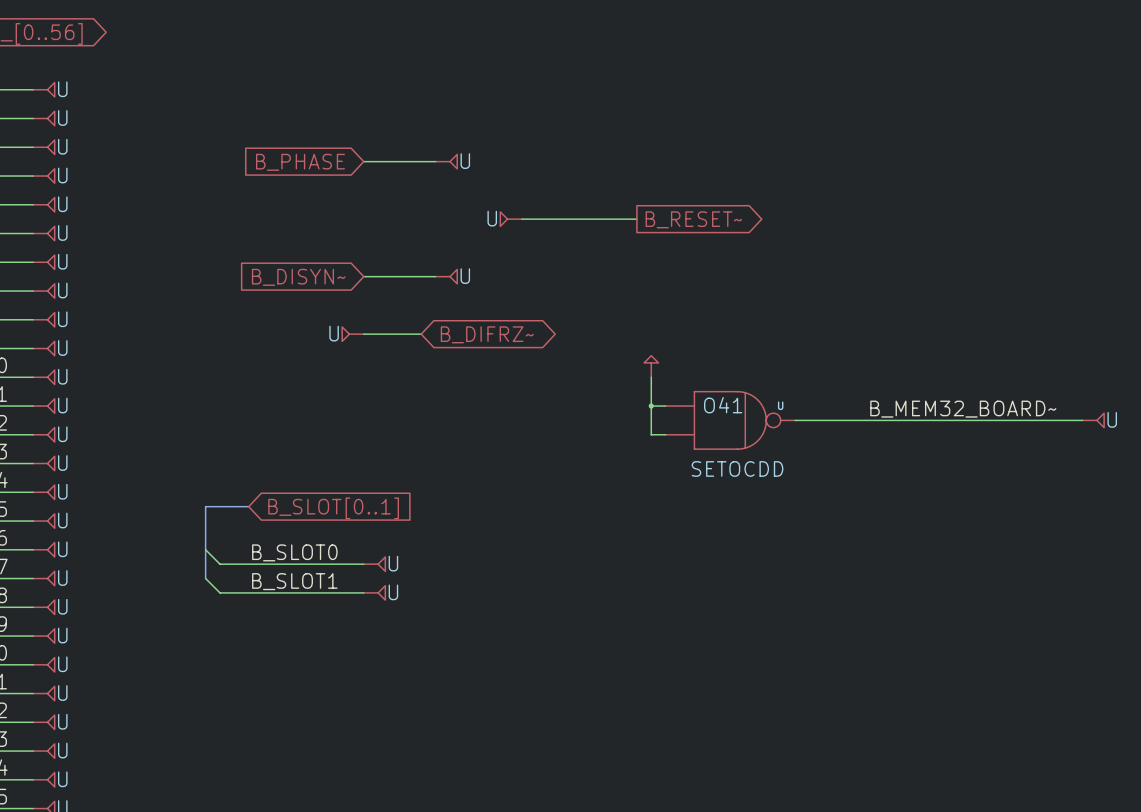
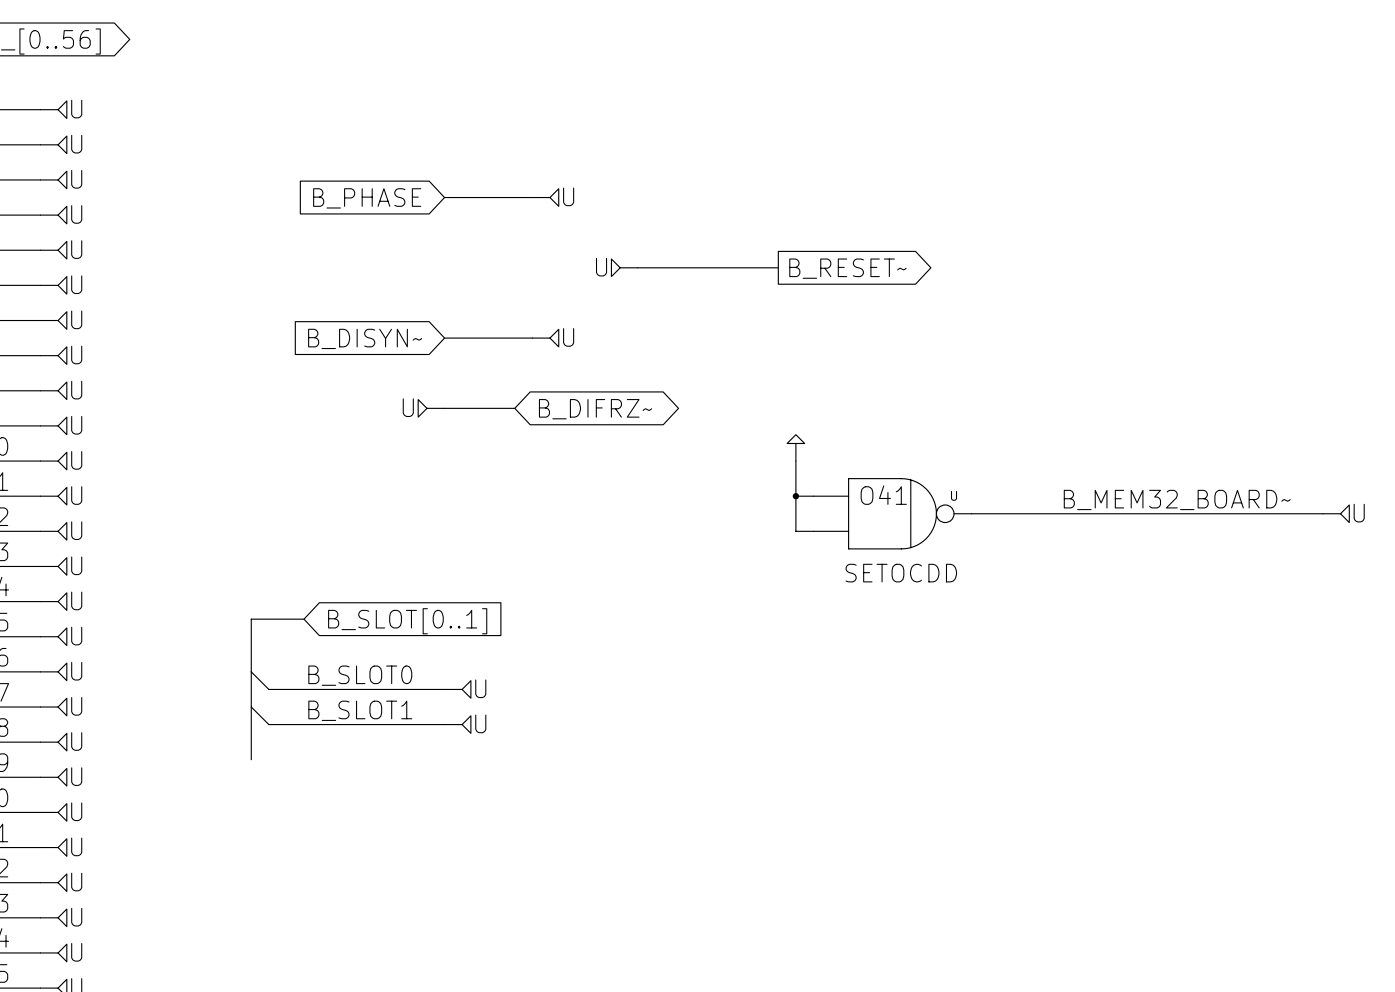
bus: none -> (251, 707) (251, 759)

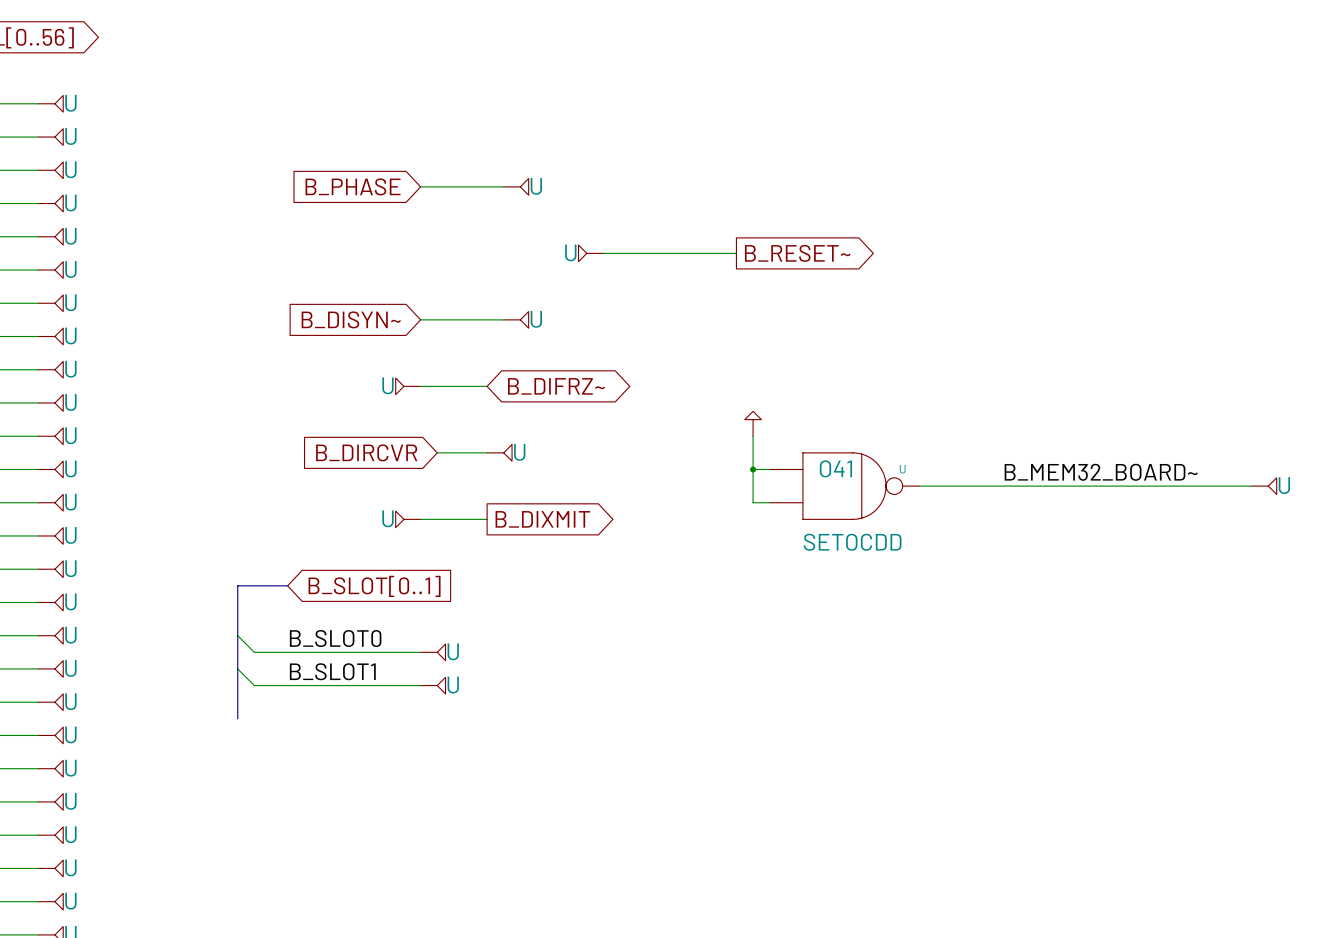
wire: none -> (437, 452) (487, 452)
U: none -> (499, 452)
global label: none -> B_DIRCVR (366, 452)
U: none -> (407, 519)
wire: none -> (420, 519) (487, 519)
global label: none -> B_DIXMIT (542, 519)

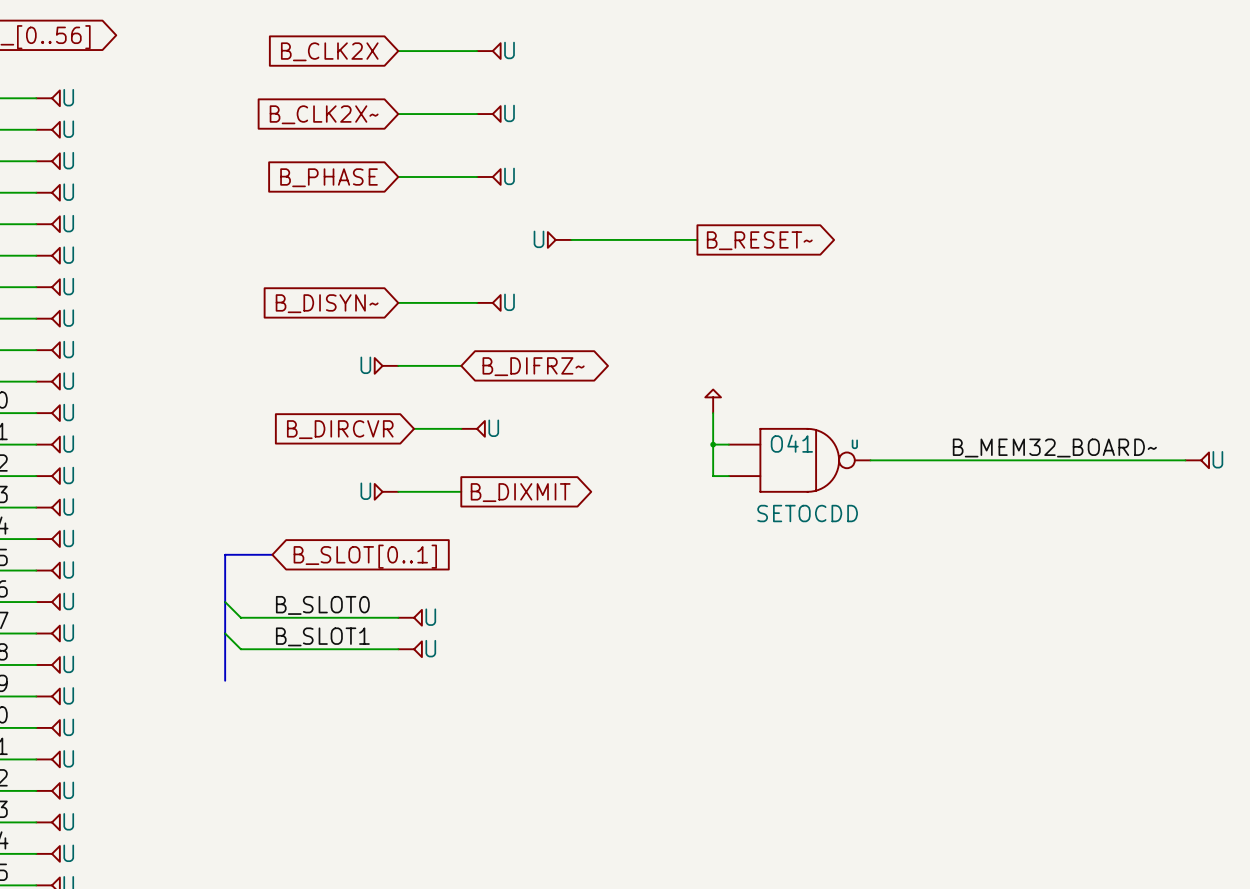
global label: none -> B_CLK2X (329, 51)
wire: none -> (398, 51) (477, 51)
U: none -> (489, 51)
global label: none -> B_CLK2X~ (324, 114)
wire: none -> (398, 114) (477, 114)
U: none -> (489, 114)

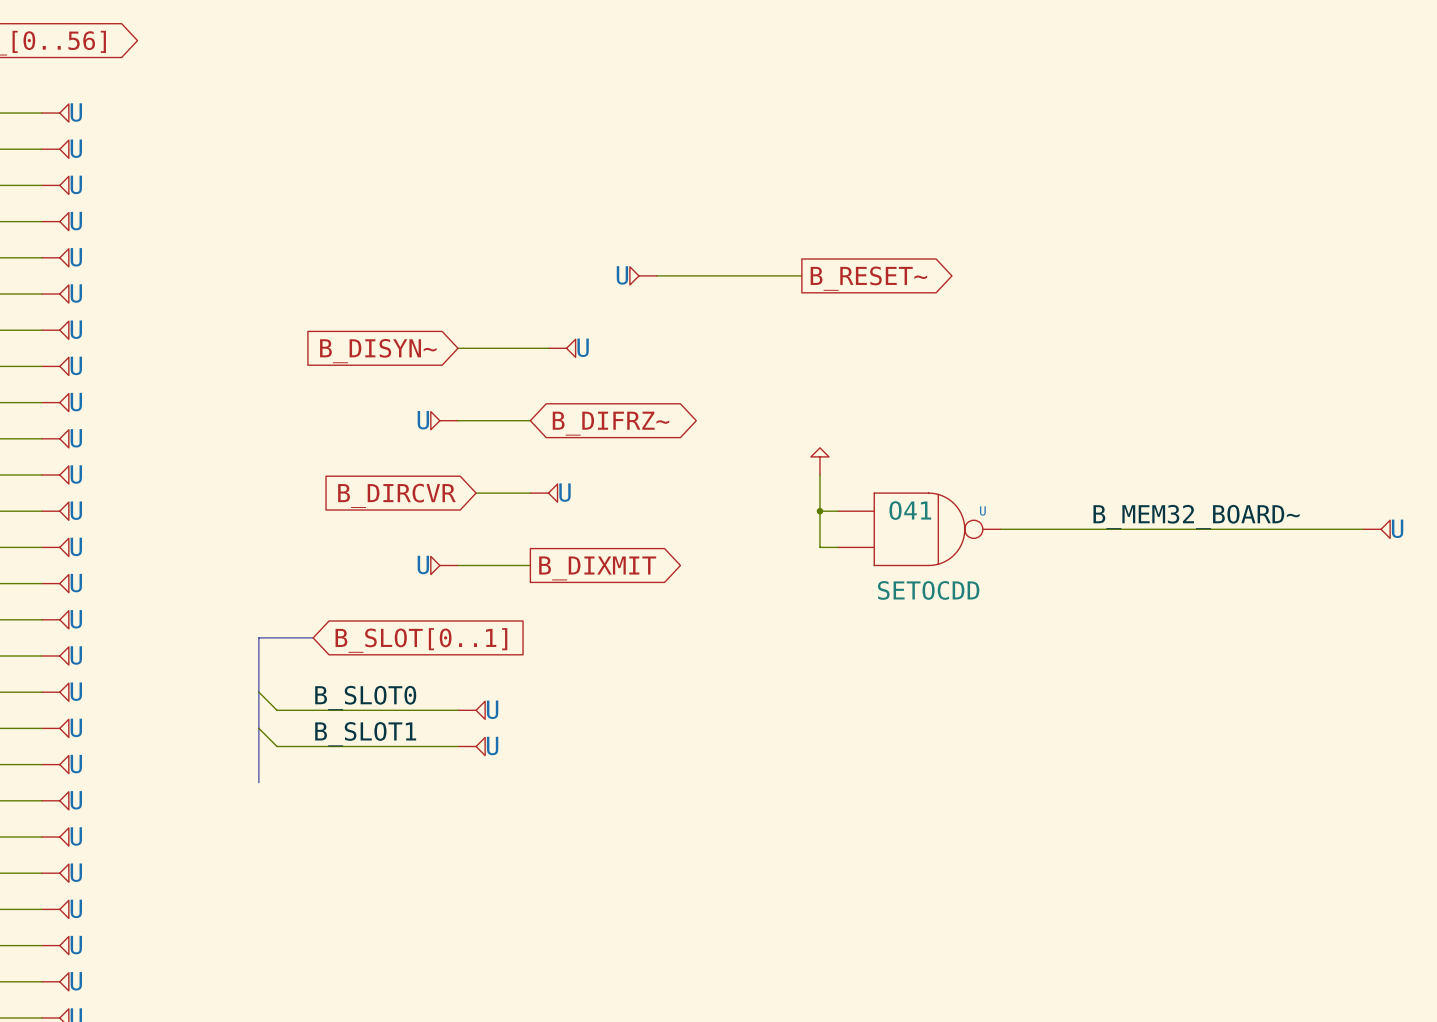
global label: B_CLK2X (329, 51) -> none
wire: (398, 51) (477, 51) -> none
U: (489, 51) -> none
global label: B_CLK2X~ (324, 114) -> none
wire: (398, 114) (477, 114) -> none
U: (489, 114) -> none
global label: B_PHASE (329, 177) -> none
wire: (398, 177) (477, 177) -> none
U: (489, 177) -> none

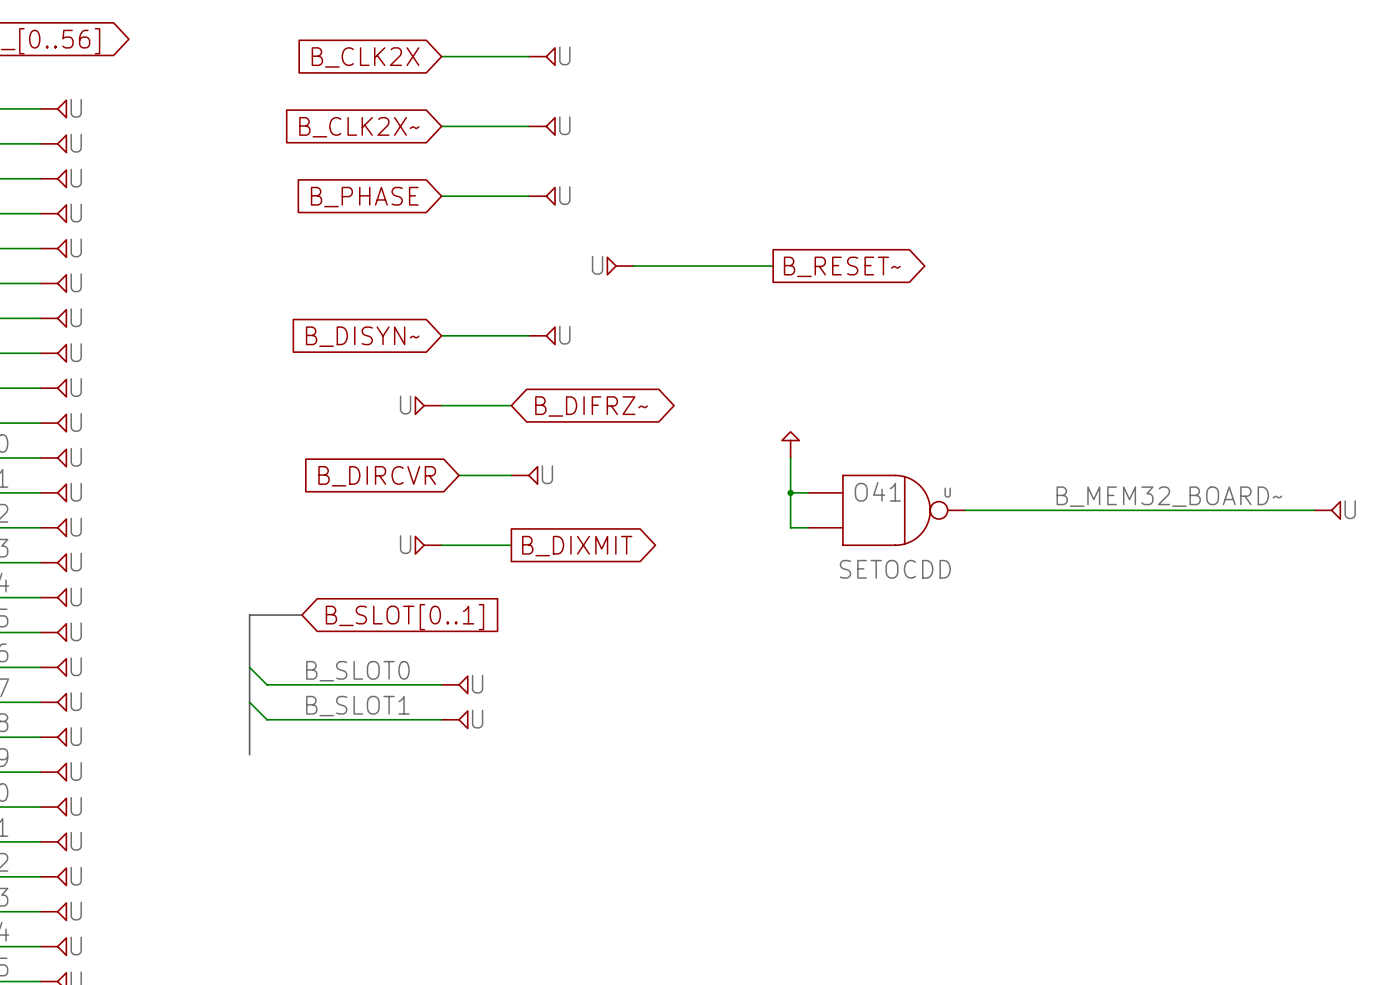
wire: none -> (441, 56) (528, 56)
U: none -> (542, 56)
global label: none -> B_CLK2X (365, 57)
wire: none -> (441, 126) (528, 126)
U: none -> (542, 126)
global label: none -> B_CLK2X~ (359, 127)
wire: none -> (441, 196) (528, 196)
U: none -> (542, 196)
global label: none -> B_PHASE (364, 197)

